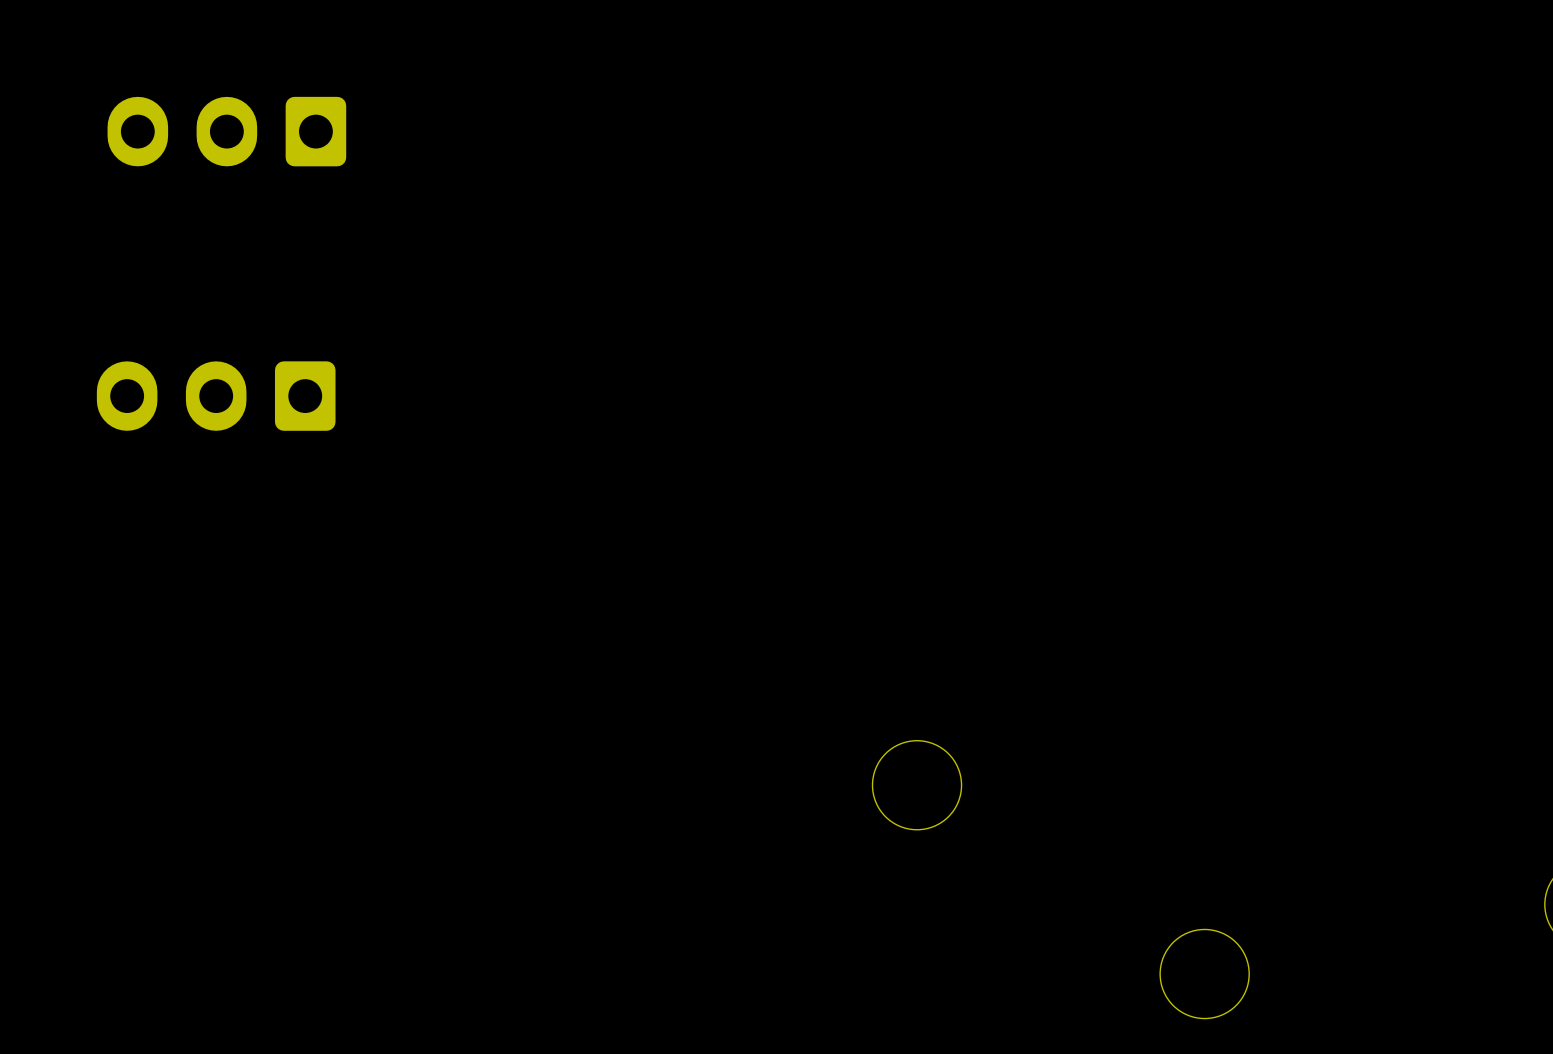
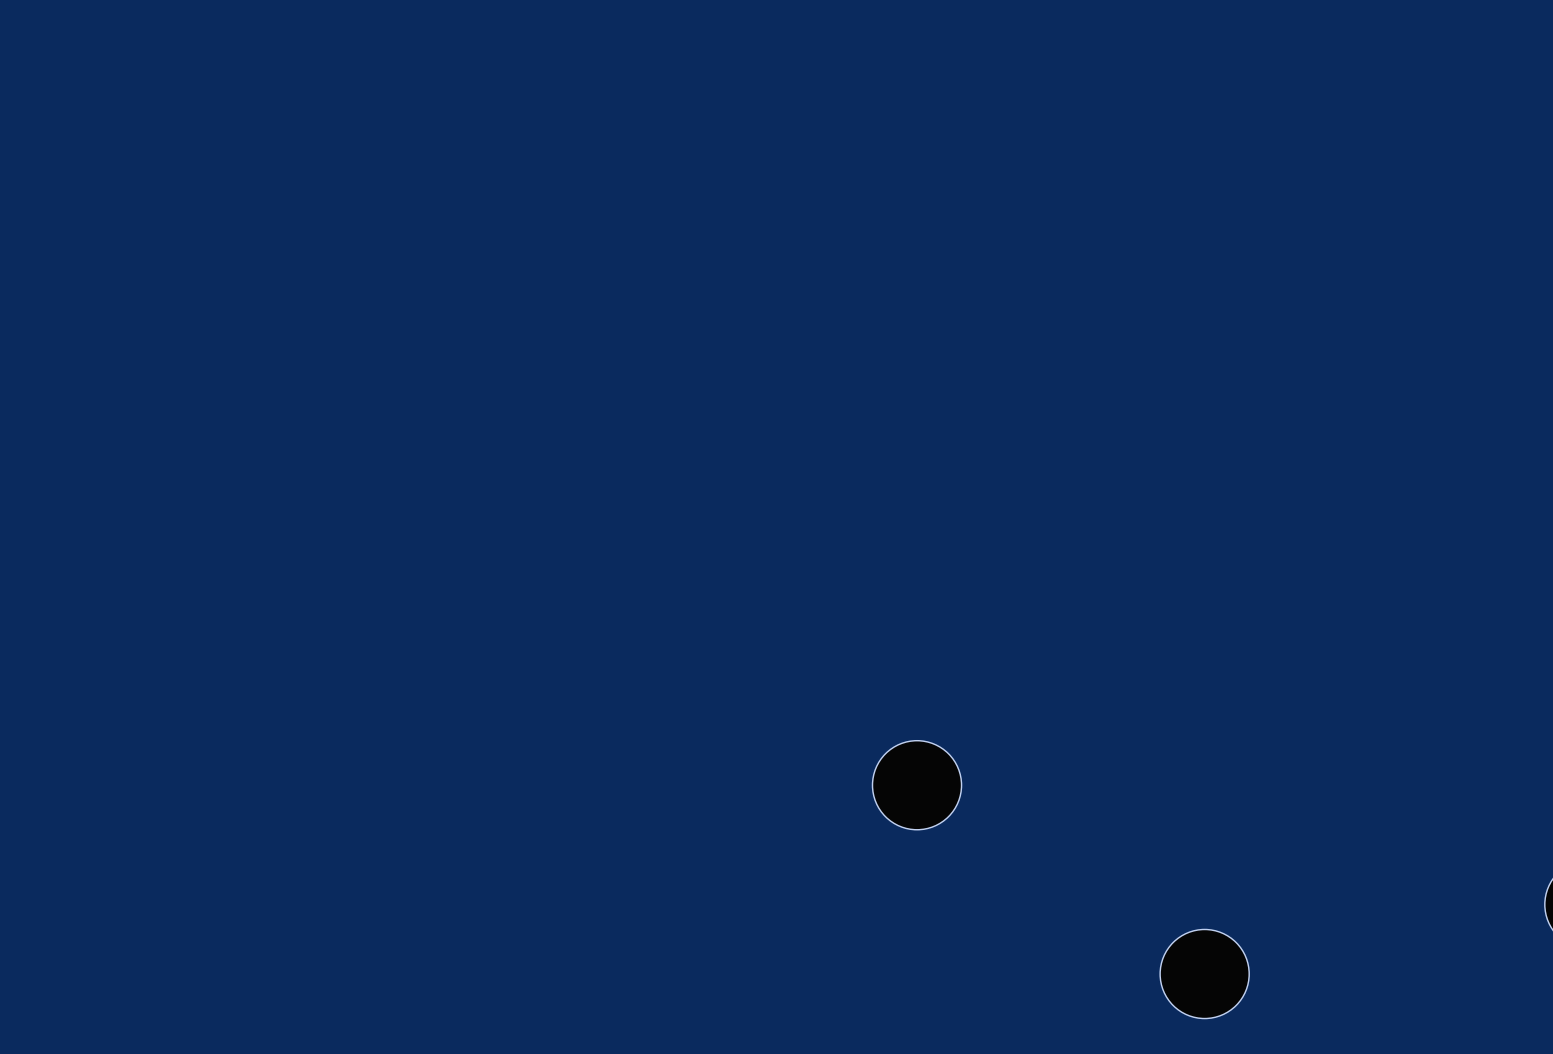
part: (226, 131) -> none
part: (216, 396) -> none

